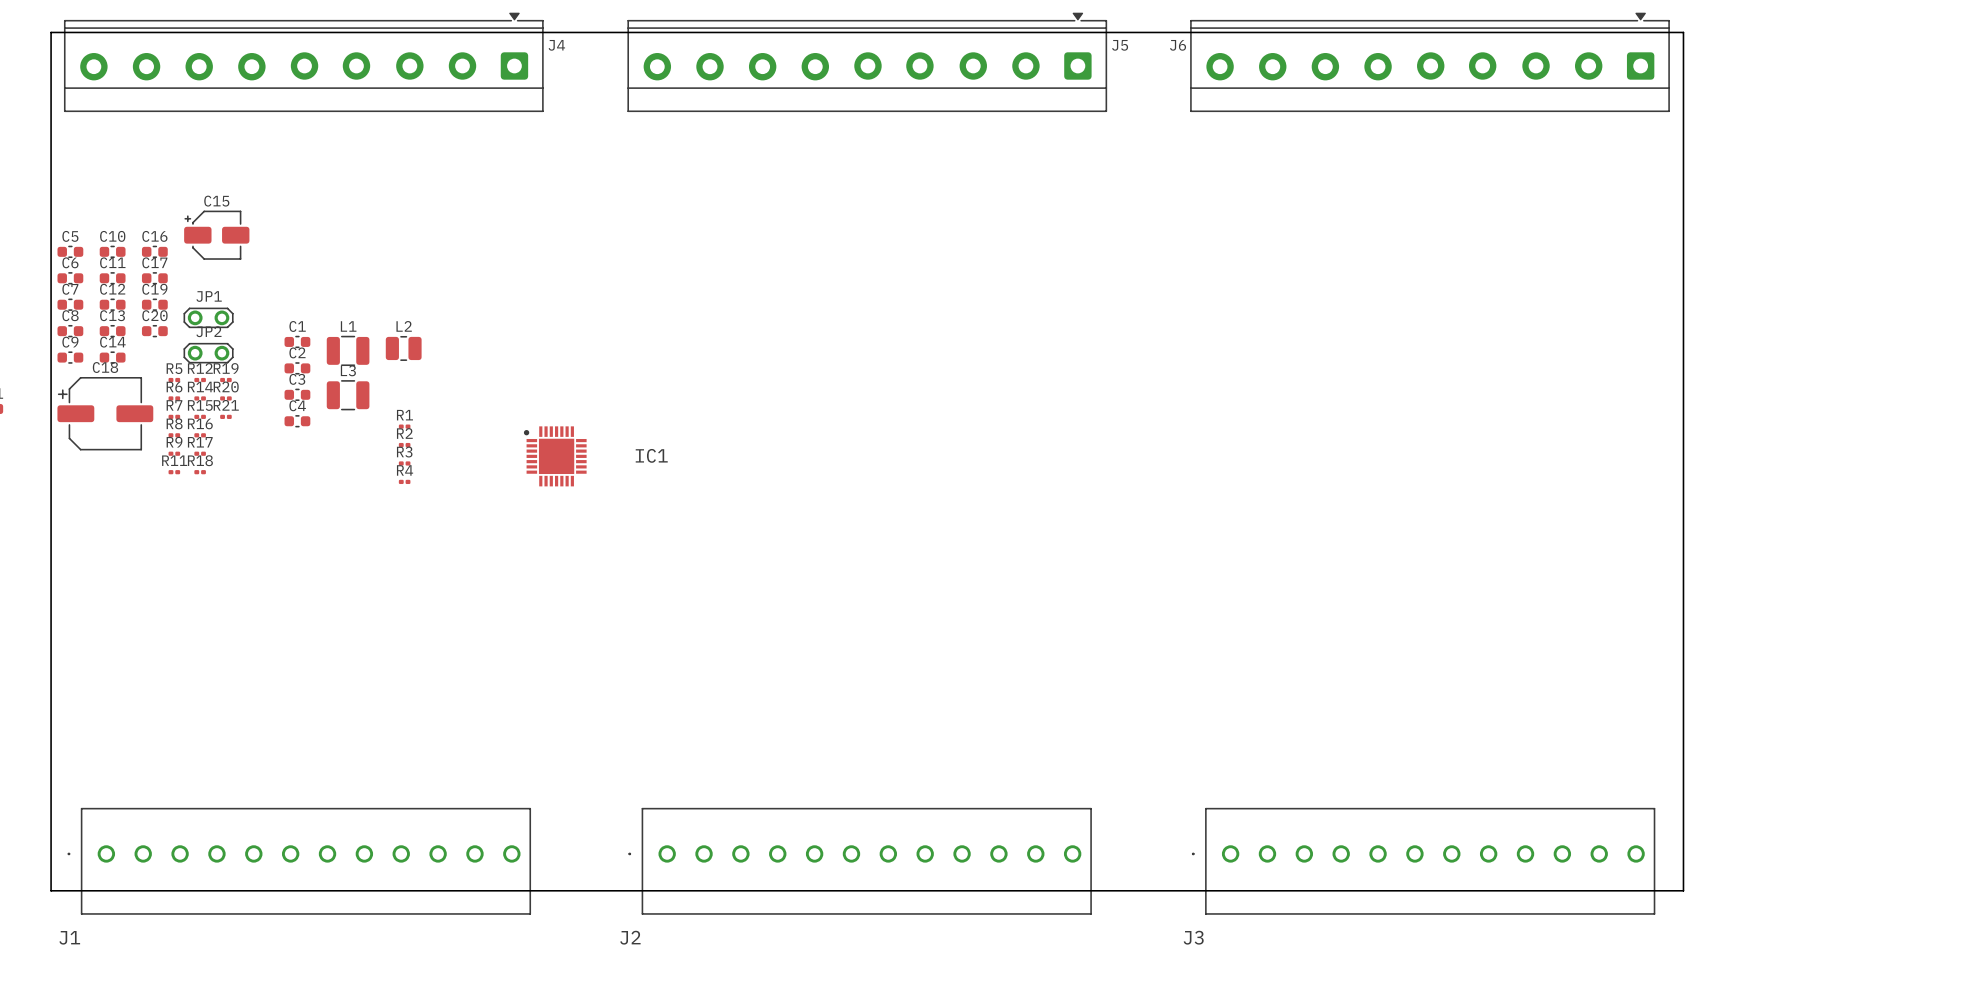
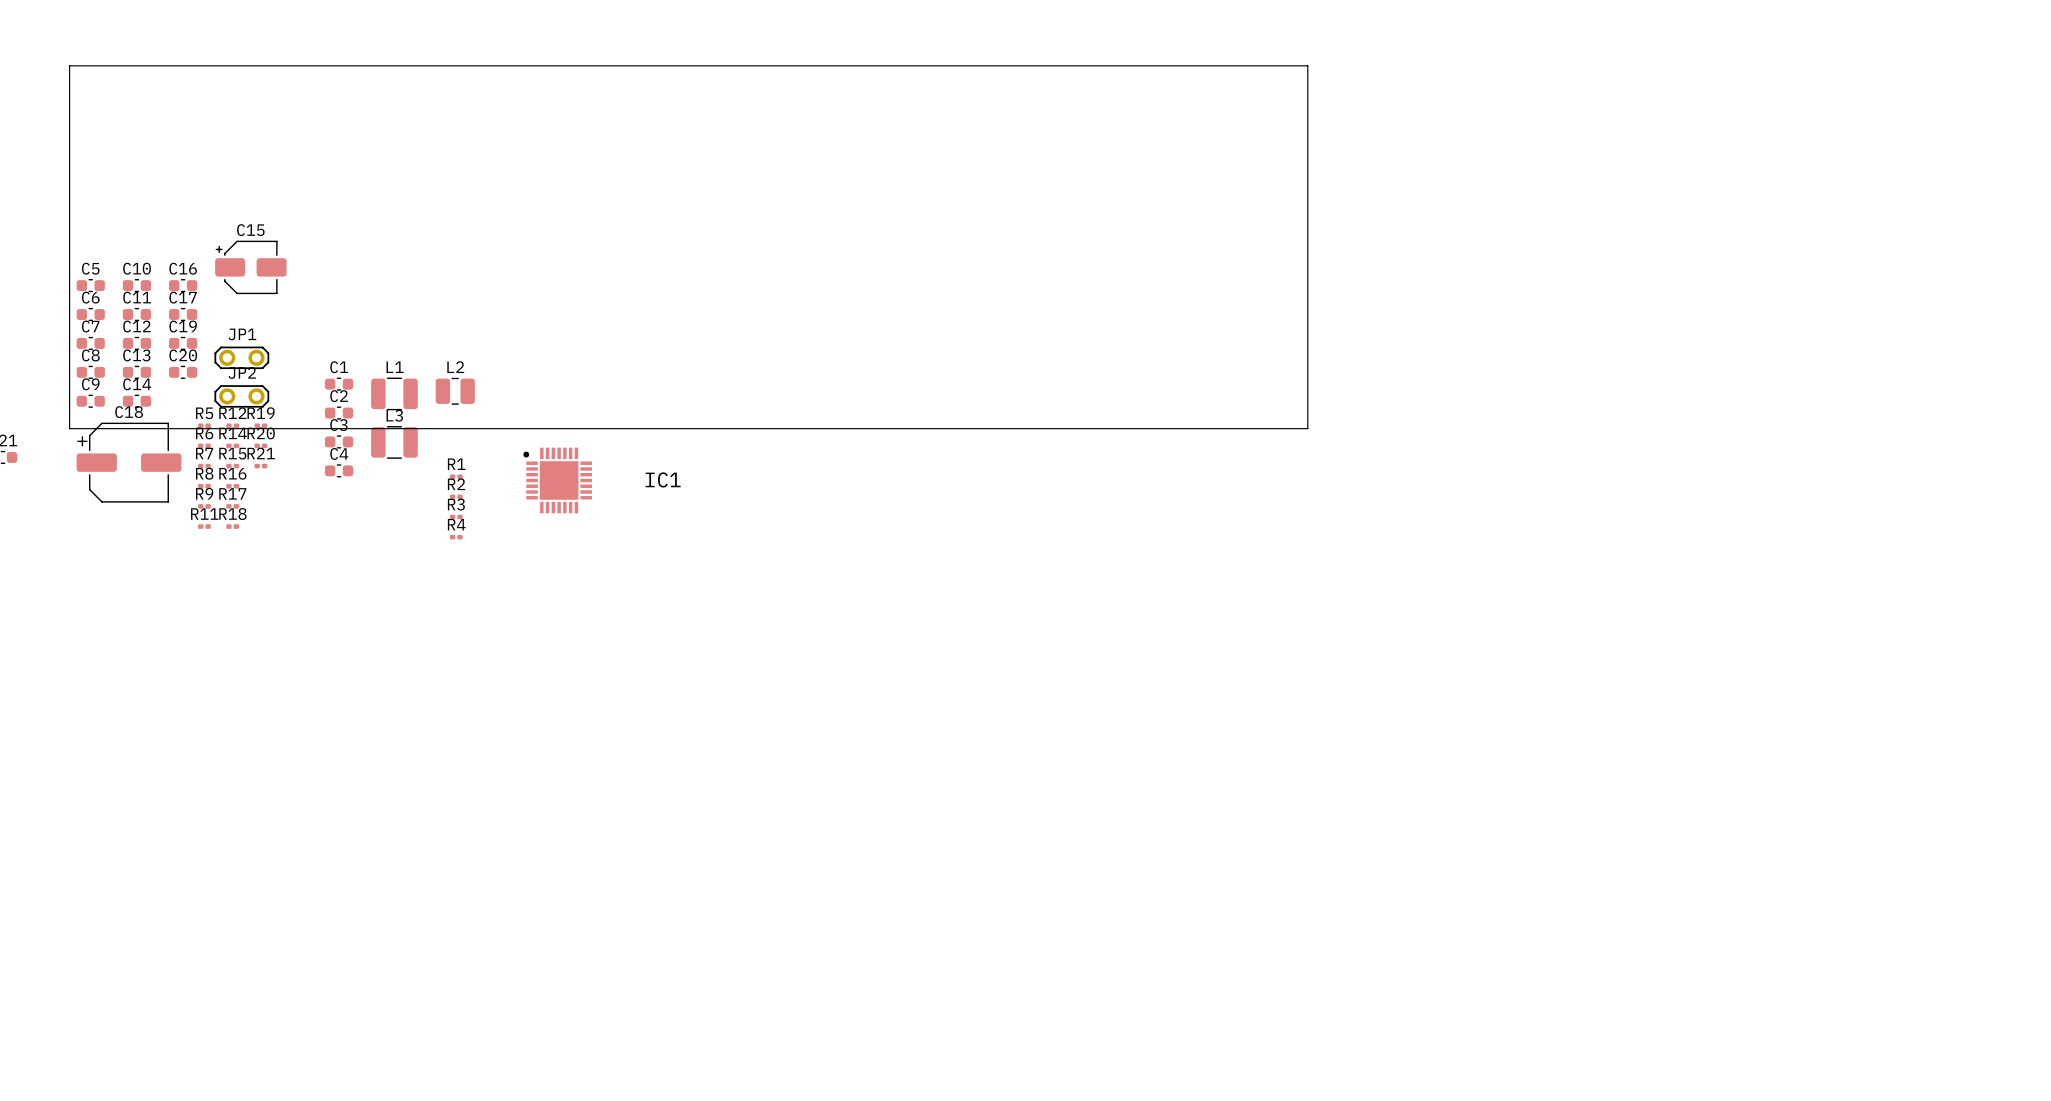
board edge: (51, 50) (51, 32) (1683, 32) (1683, 890) (51, 890) (51, 382) -> (69, 65) (1307, 65) (1307, 428) (69, 428)
J4: (303, 62) -> none
J5: (867, 62) -> none
J6: (1430, 62) -> none
IC1 position: (555, 456) -> (557, 480)
J1: (299, 861) -> none
J2: (860, 861) -> none
J3: (1423, 861) -> none

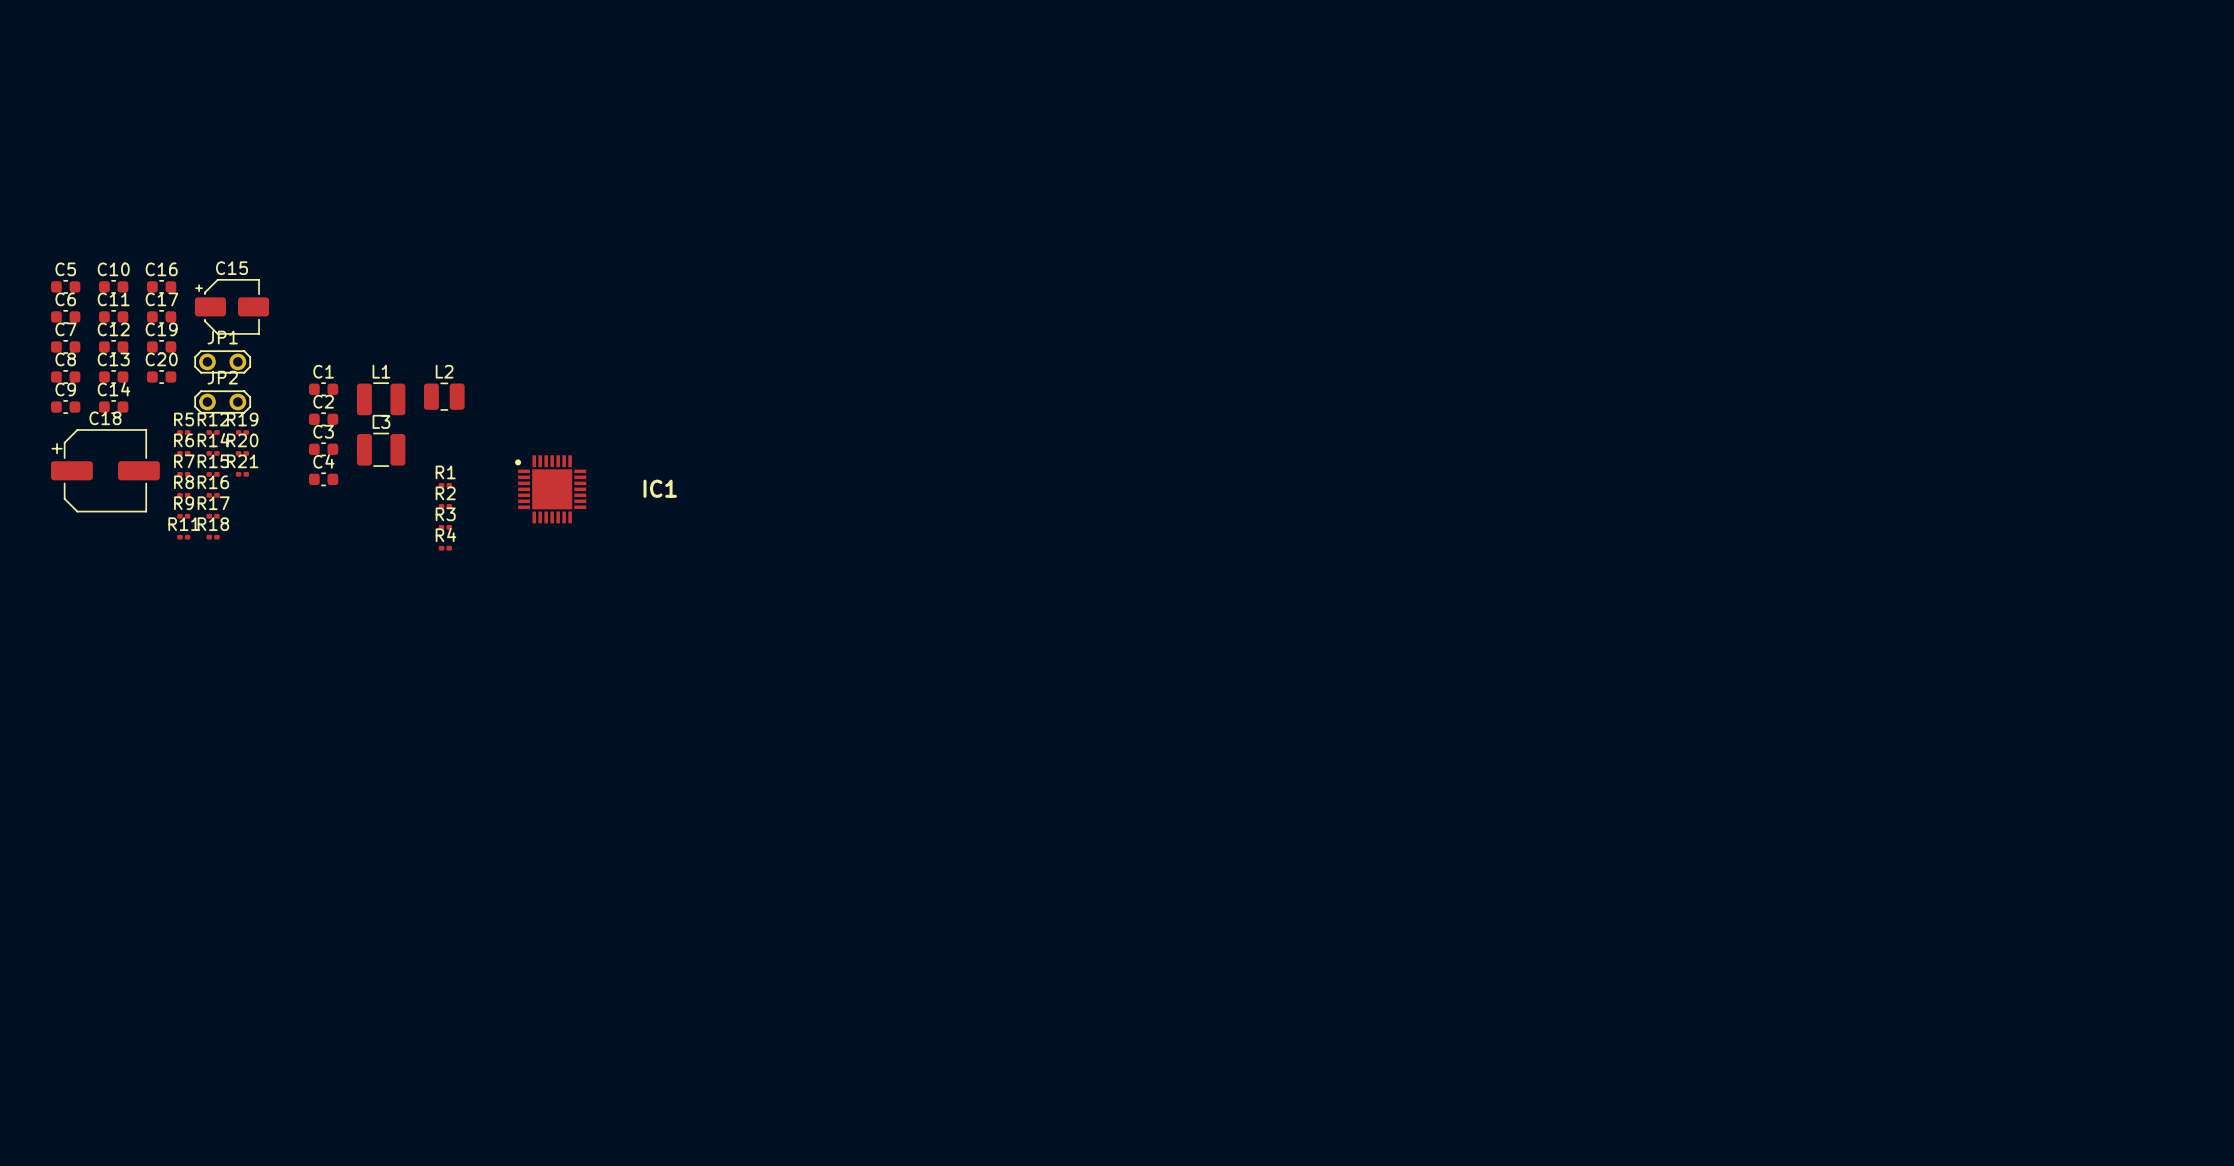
board edge: (69, 65) (1307, 65) (1307, 428) (69, 428) (69, 65) -> none
C15 position: (250, 267) -> (231, 306)

